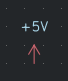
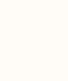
power symbol: +5V (34, 54) -> none

